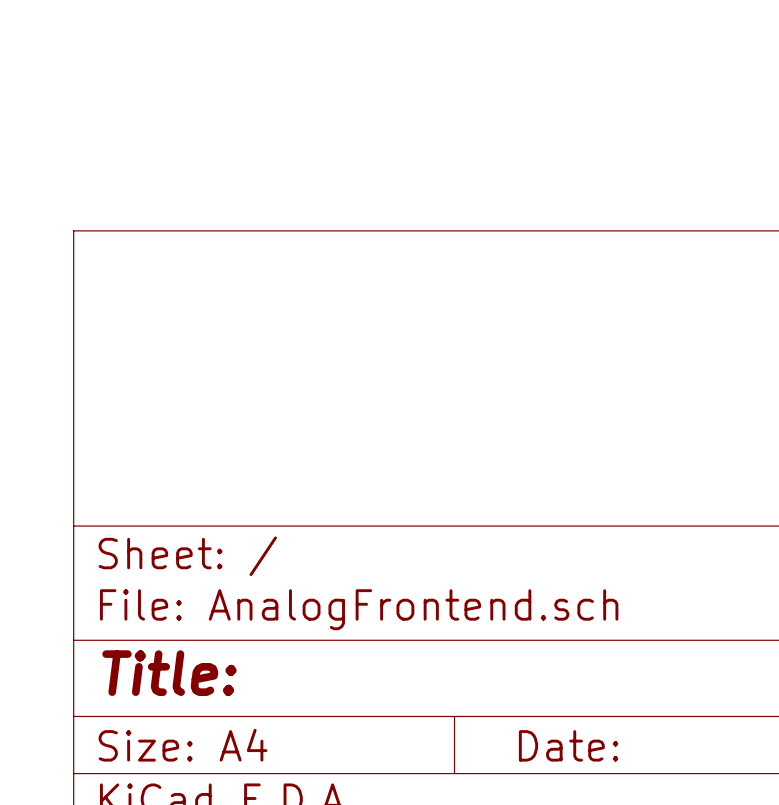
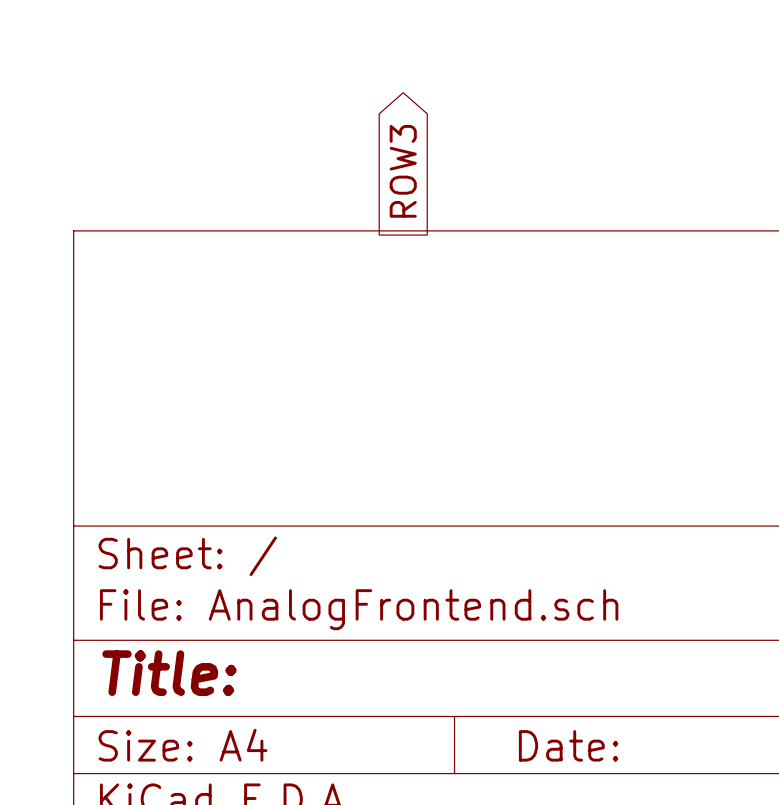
global label: none -> ROW3 (403, 171)

